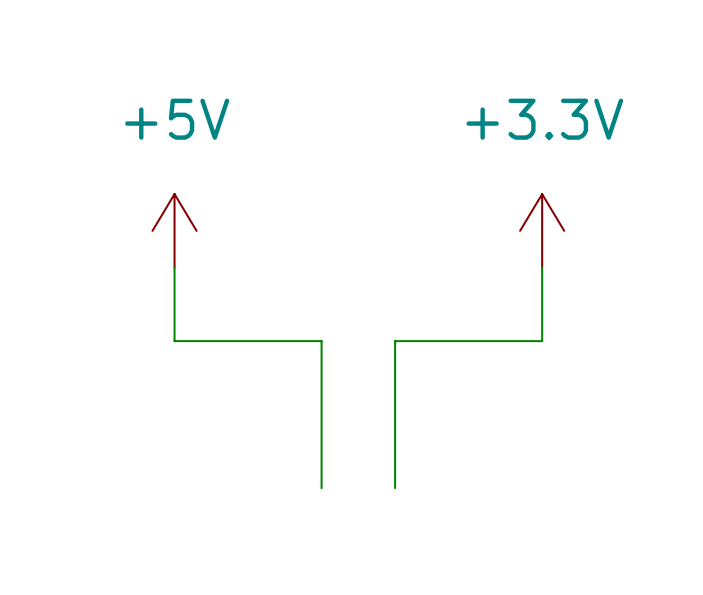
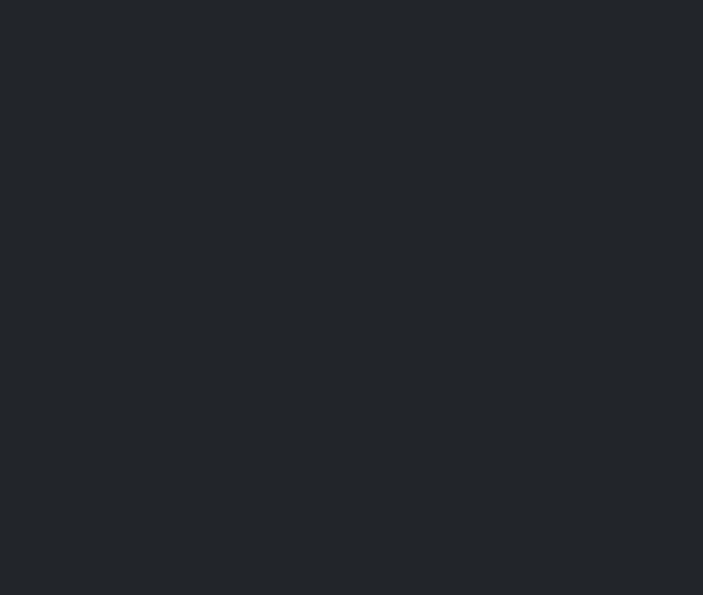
power symbol: +5V (174, 230) -> none
power symbol: +3.3V (542, 230) -> none
wire: (174, 267) (174, 341) (321, 341) (321, 488) -> none
wire: (542, 267) (542, 341) (395, 341) (395, 488) -> none

